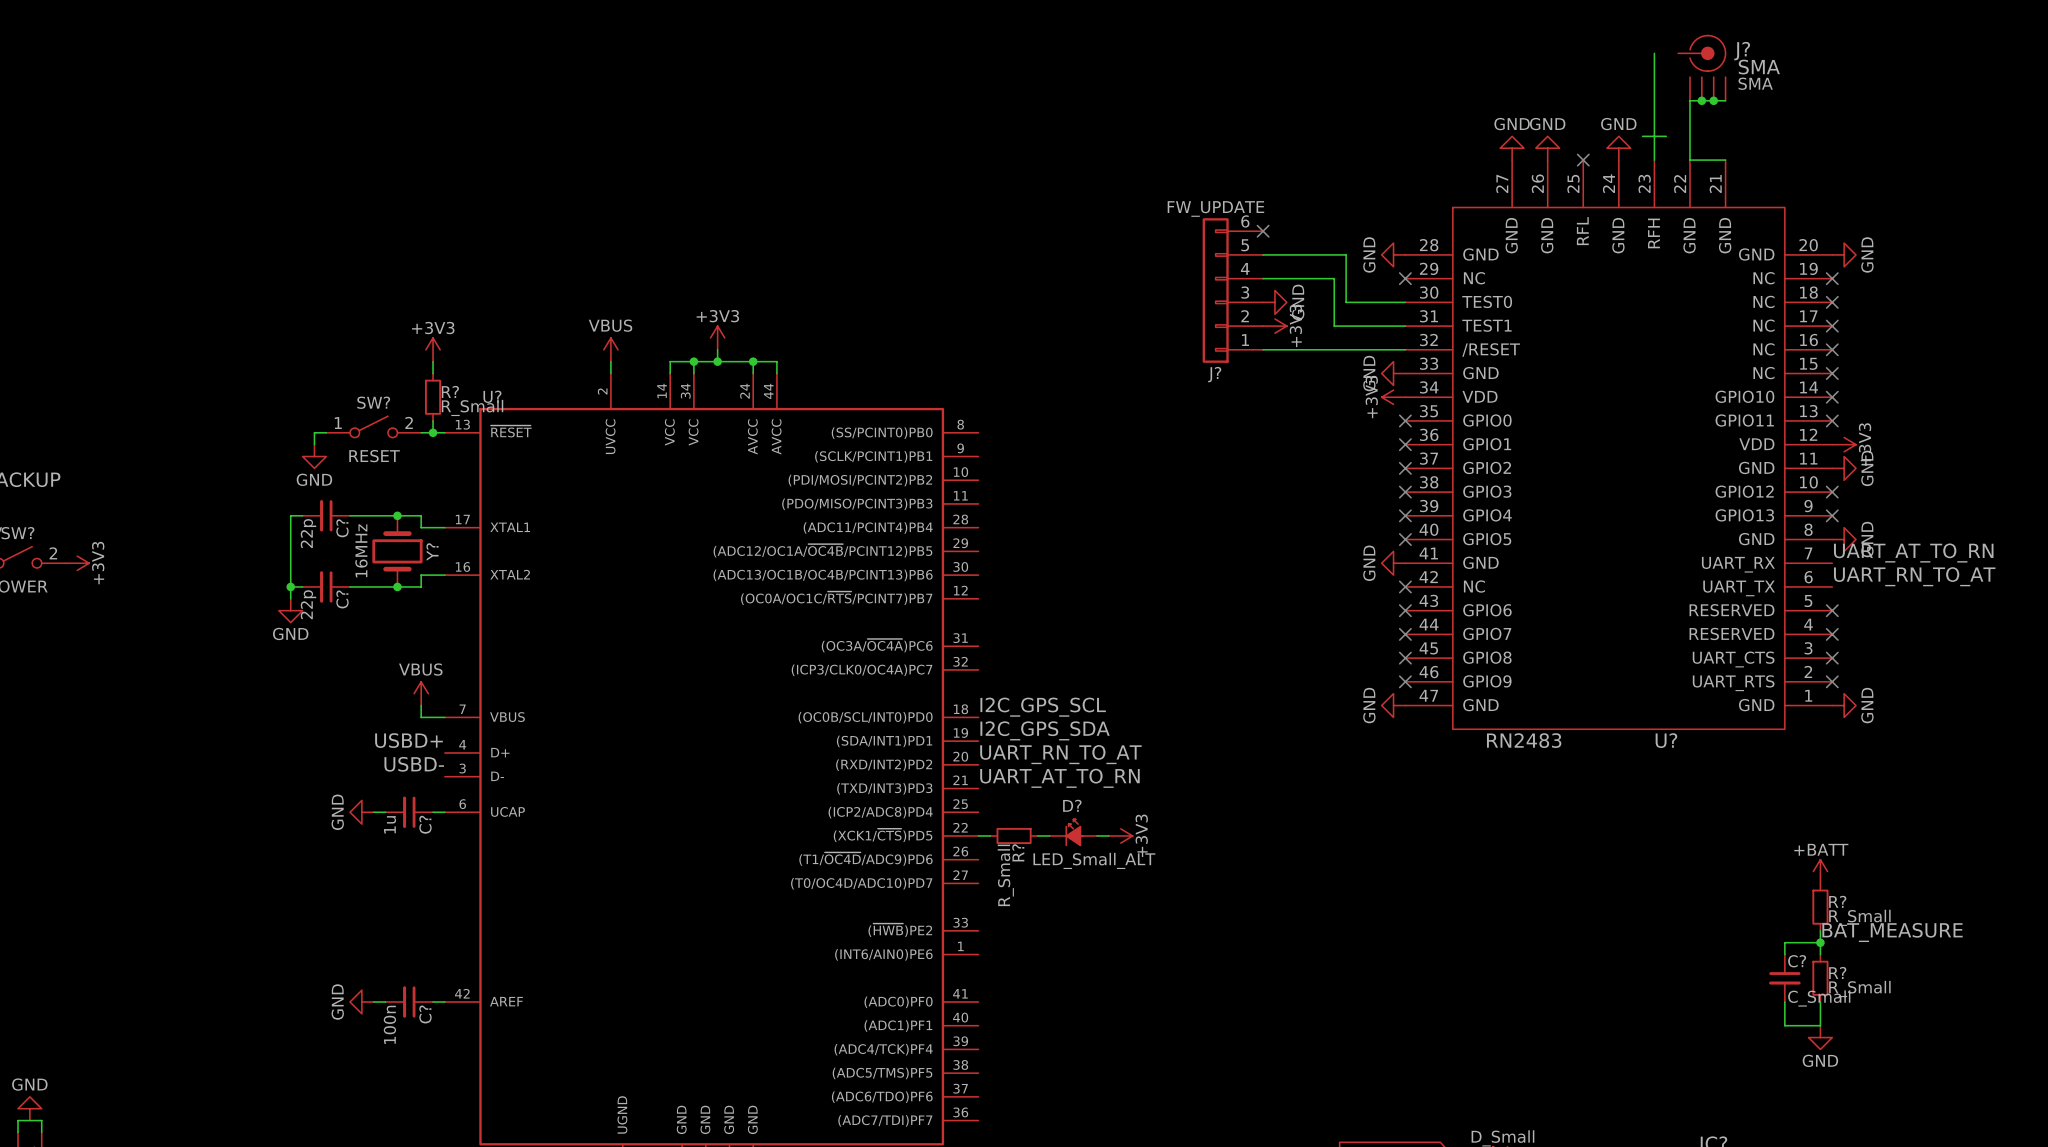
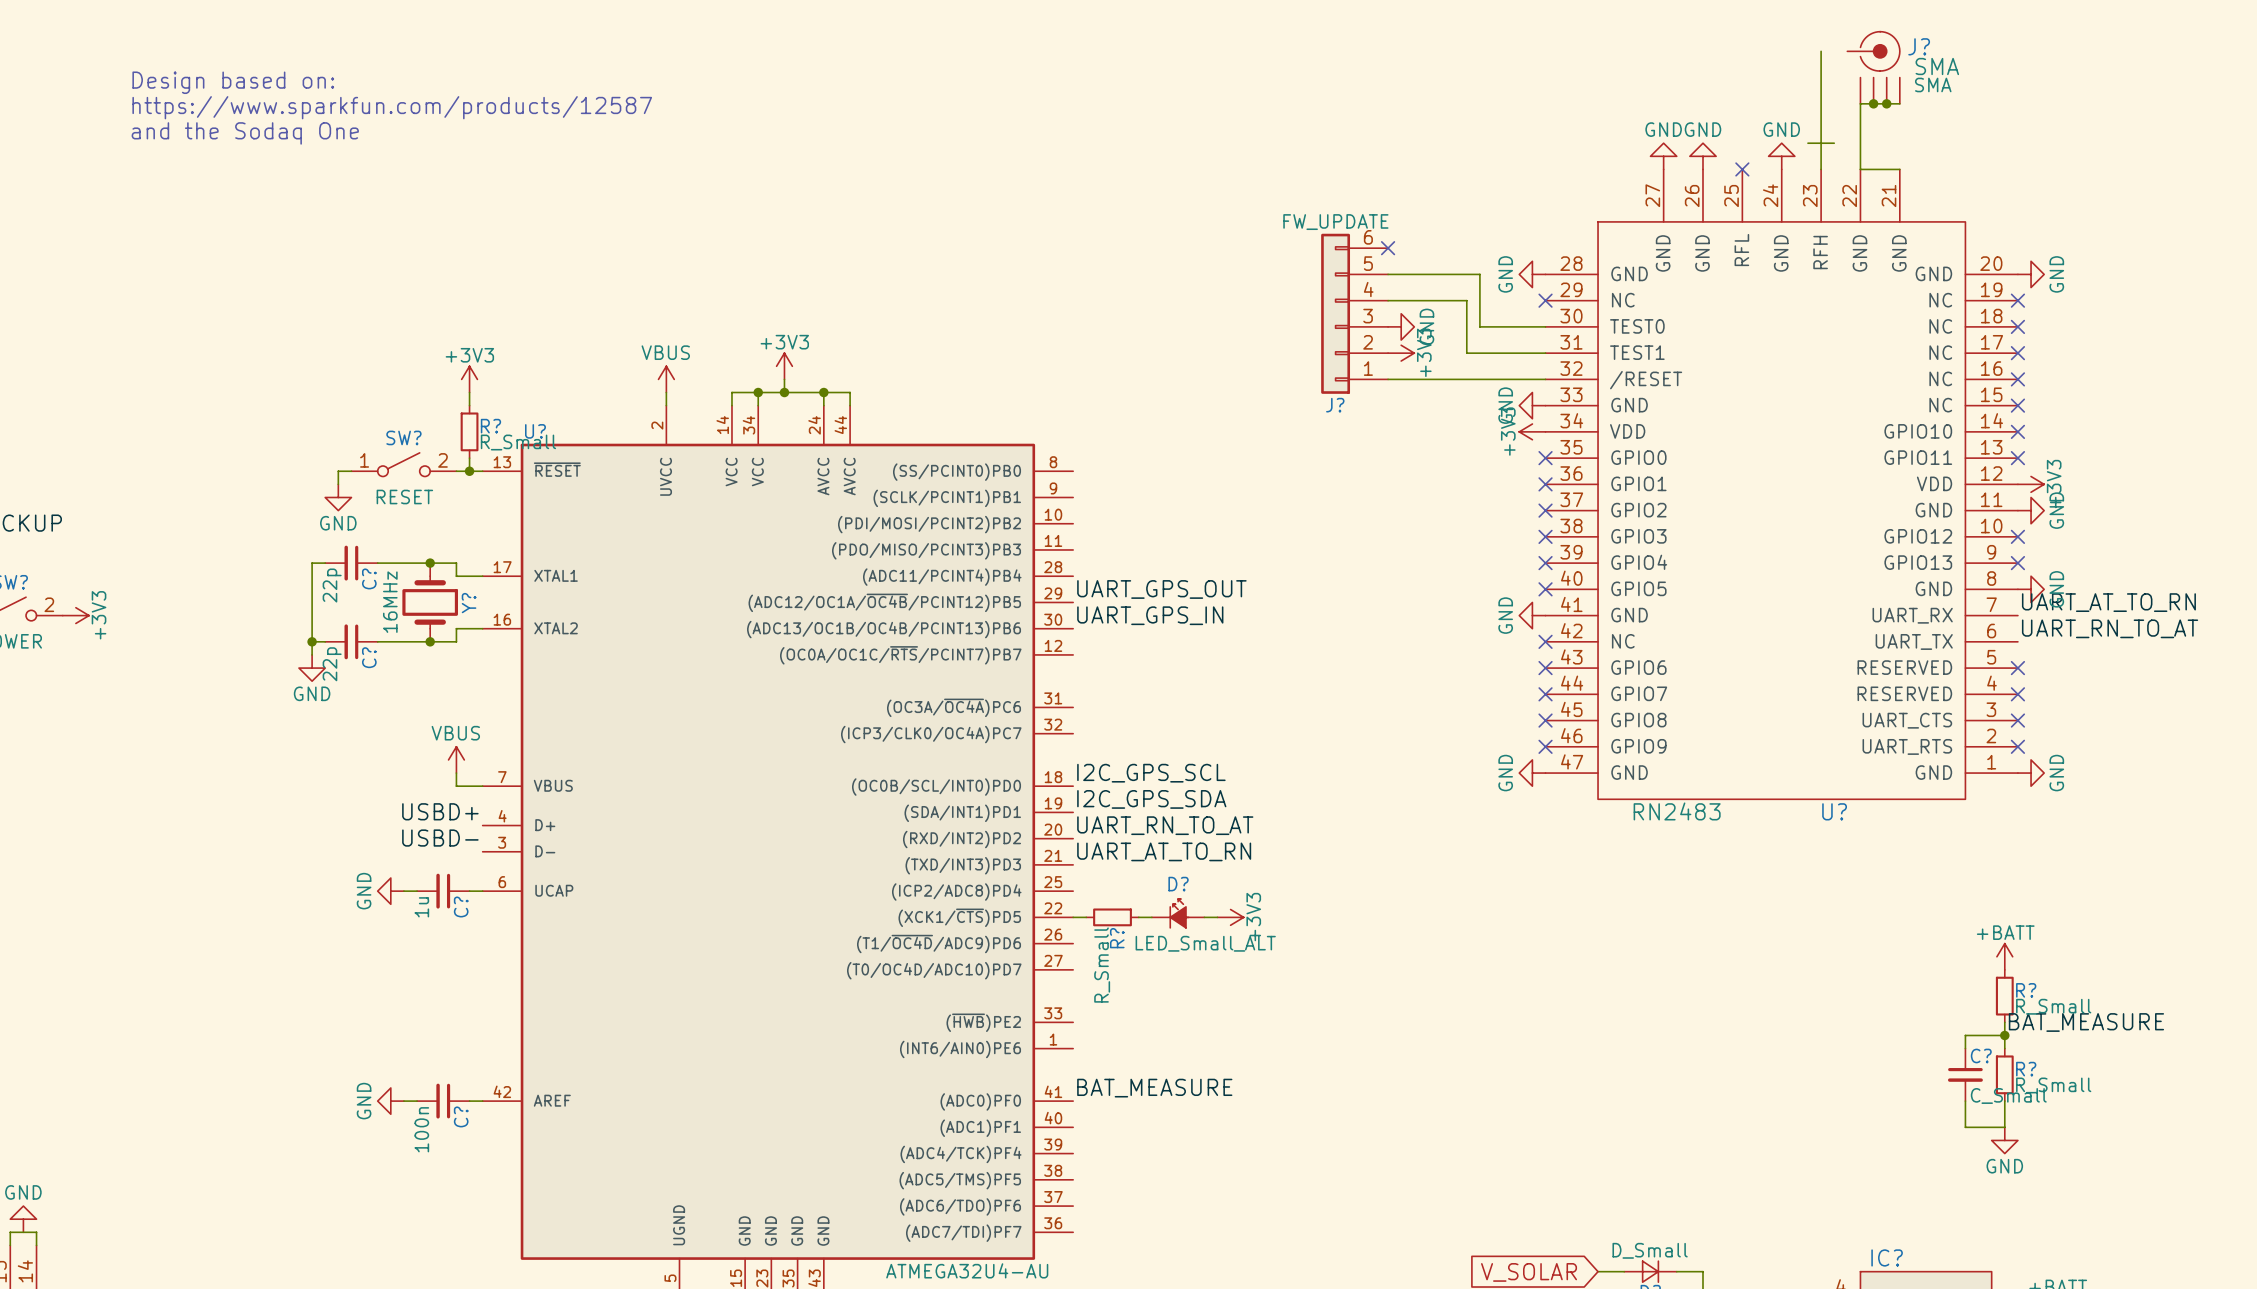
text: none -> Design based on: (233, 82)
text: none -> https://www.sparkfun.com/products/12587 (392, 107)
text: none -> and the Sodaq One (245, 133)
label: none -> UART_GPS_OUT (1161, 589)
label: none -> UART_GPS_IN (1150, 615)
label: none -> BAT_MEASURE (1154, 1088)

